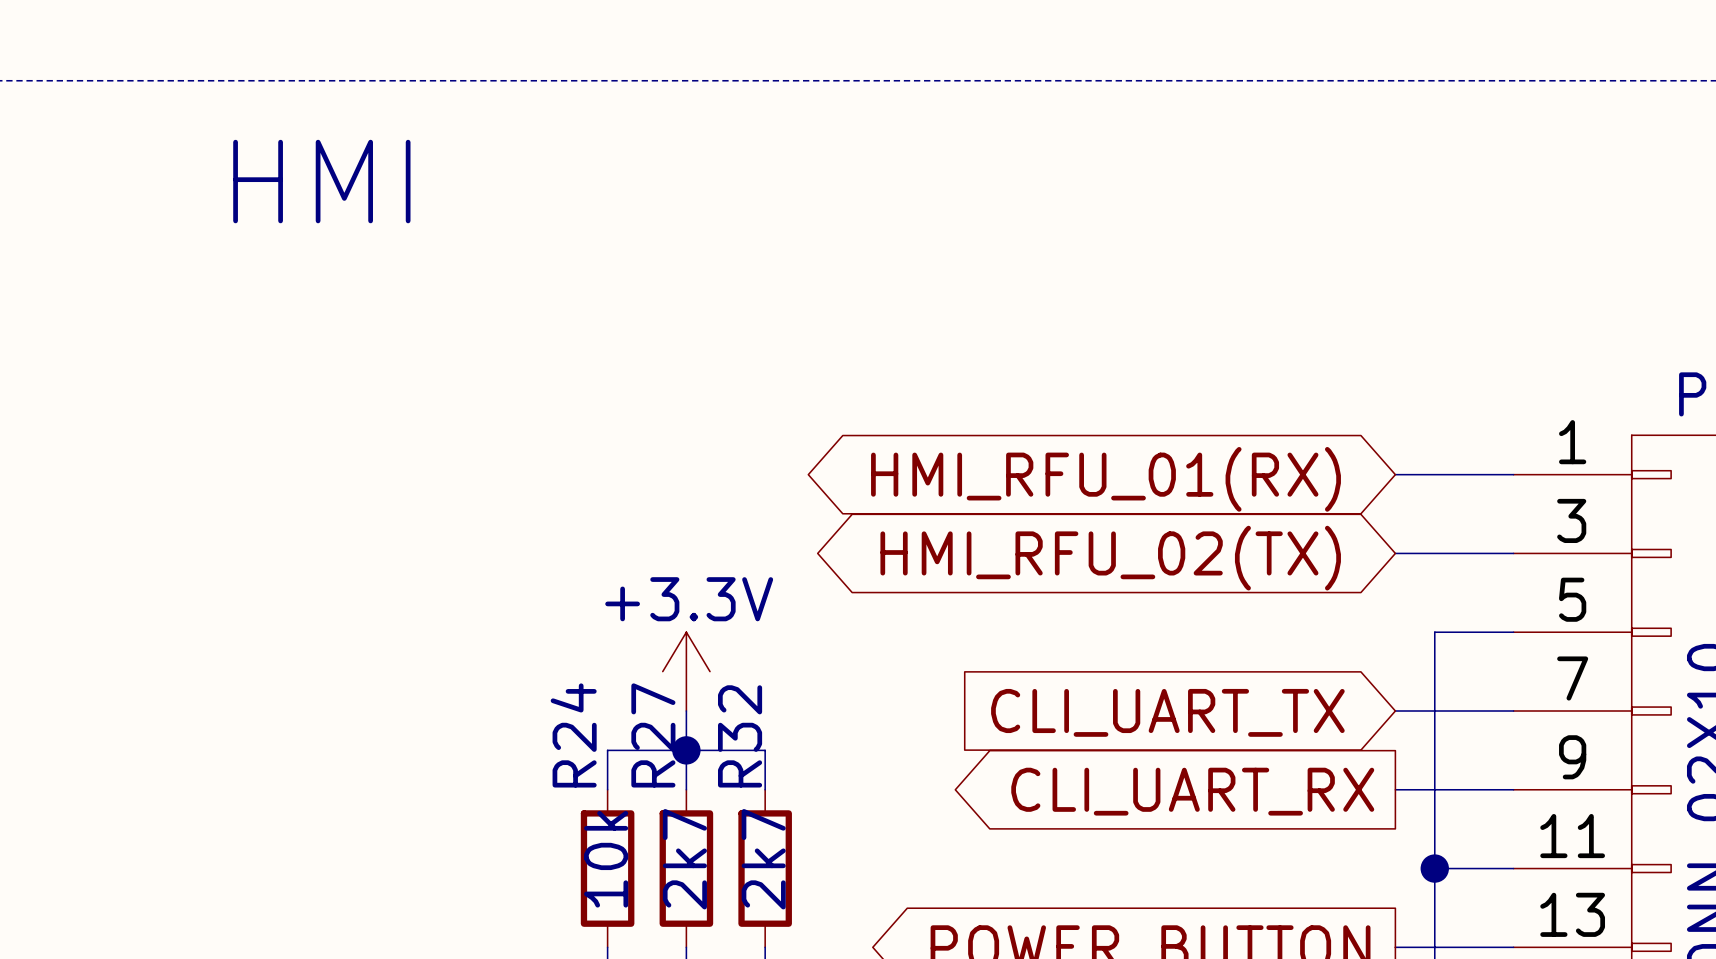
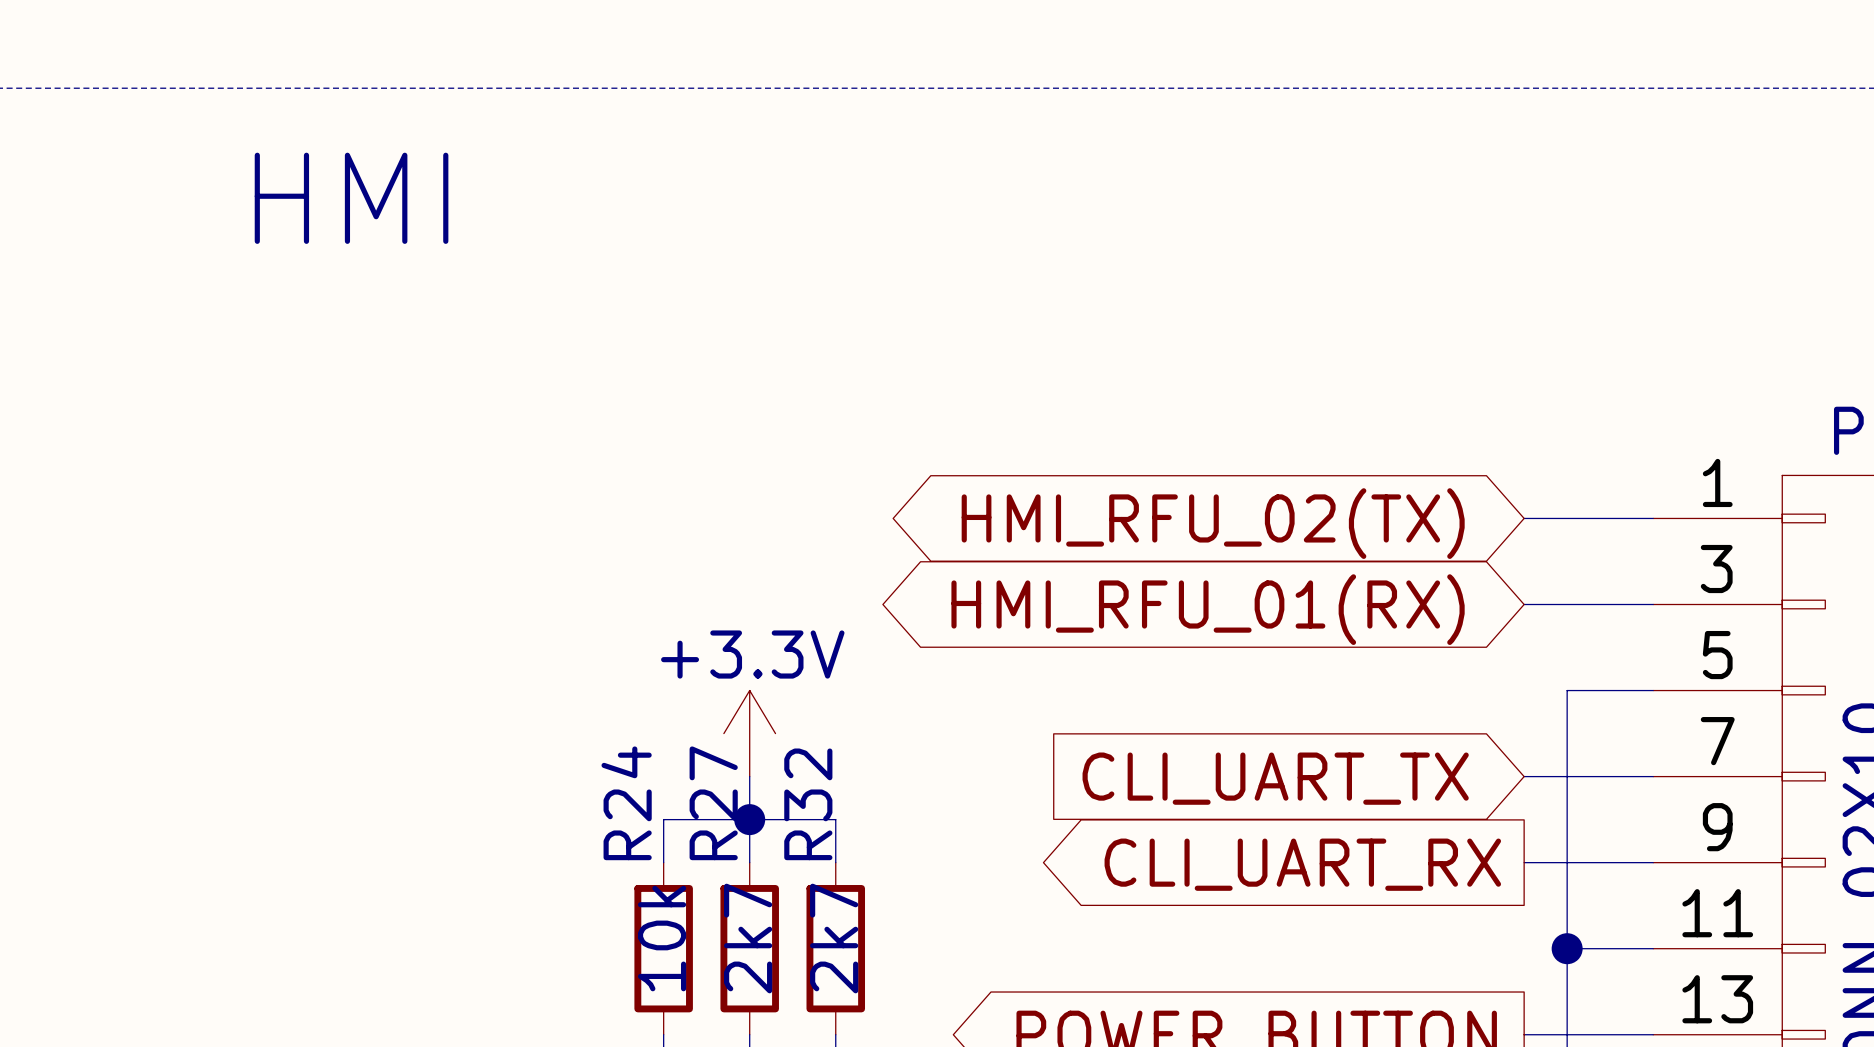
global label: HMI_RFU_01(RX) (1106, 479) -> HMI_RFU_02(TX) (1213, 523)
global label: HMI_RFU_02(TX) (1110, 558) -> HMI_RFU_01(RX) (1208, 609)

